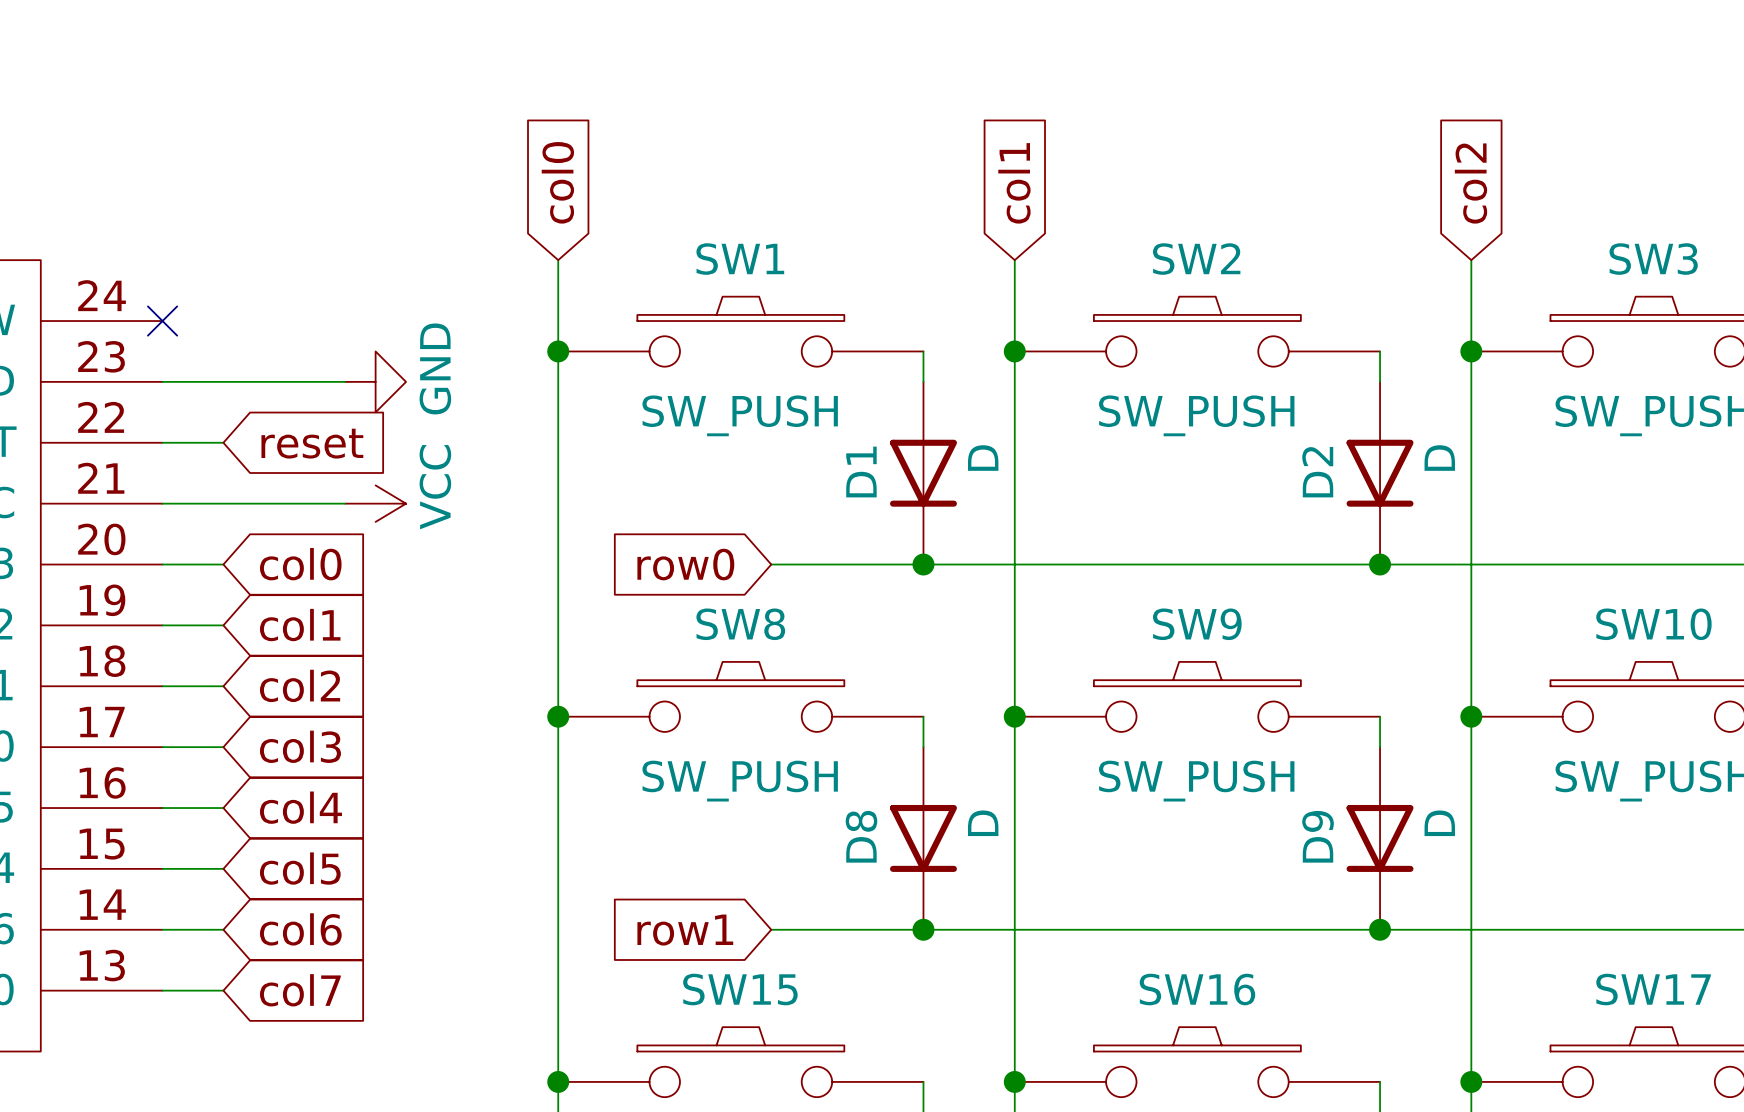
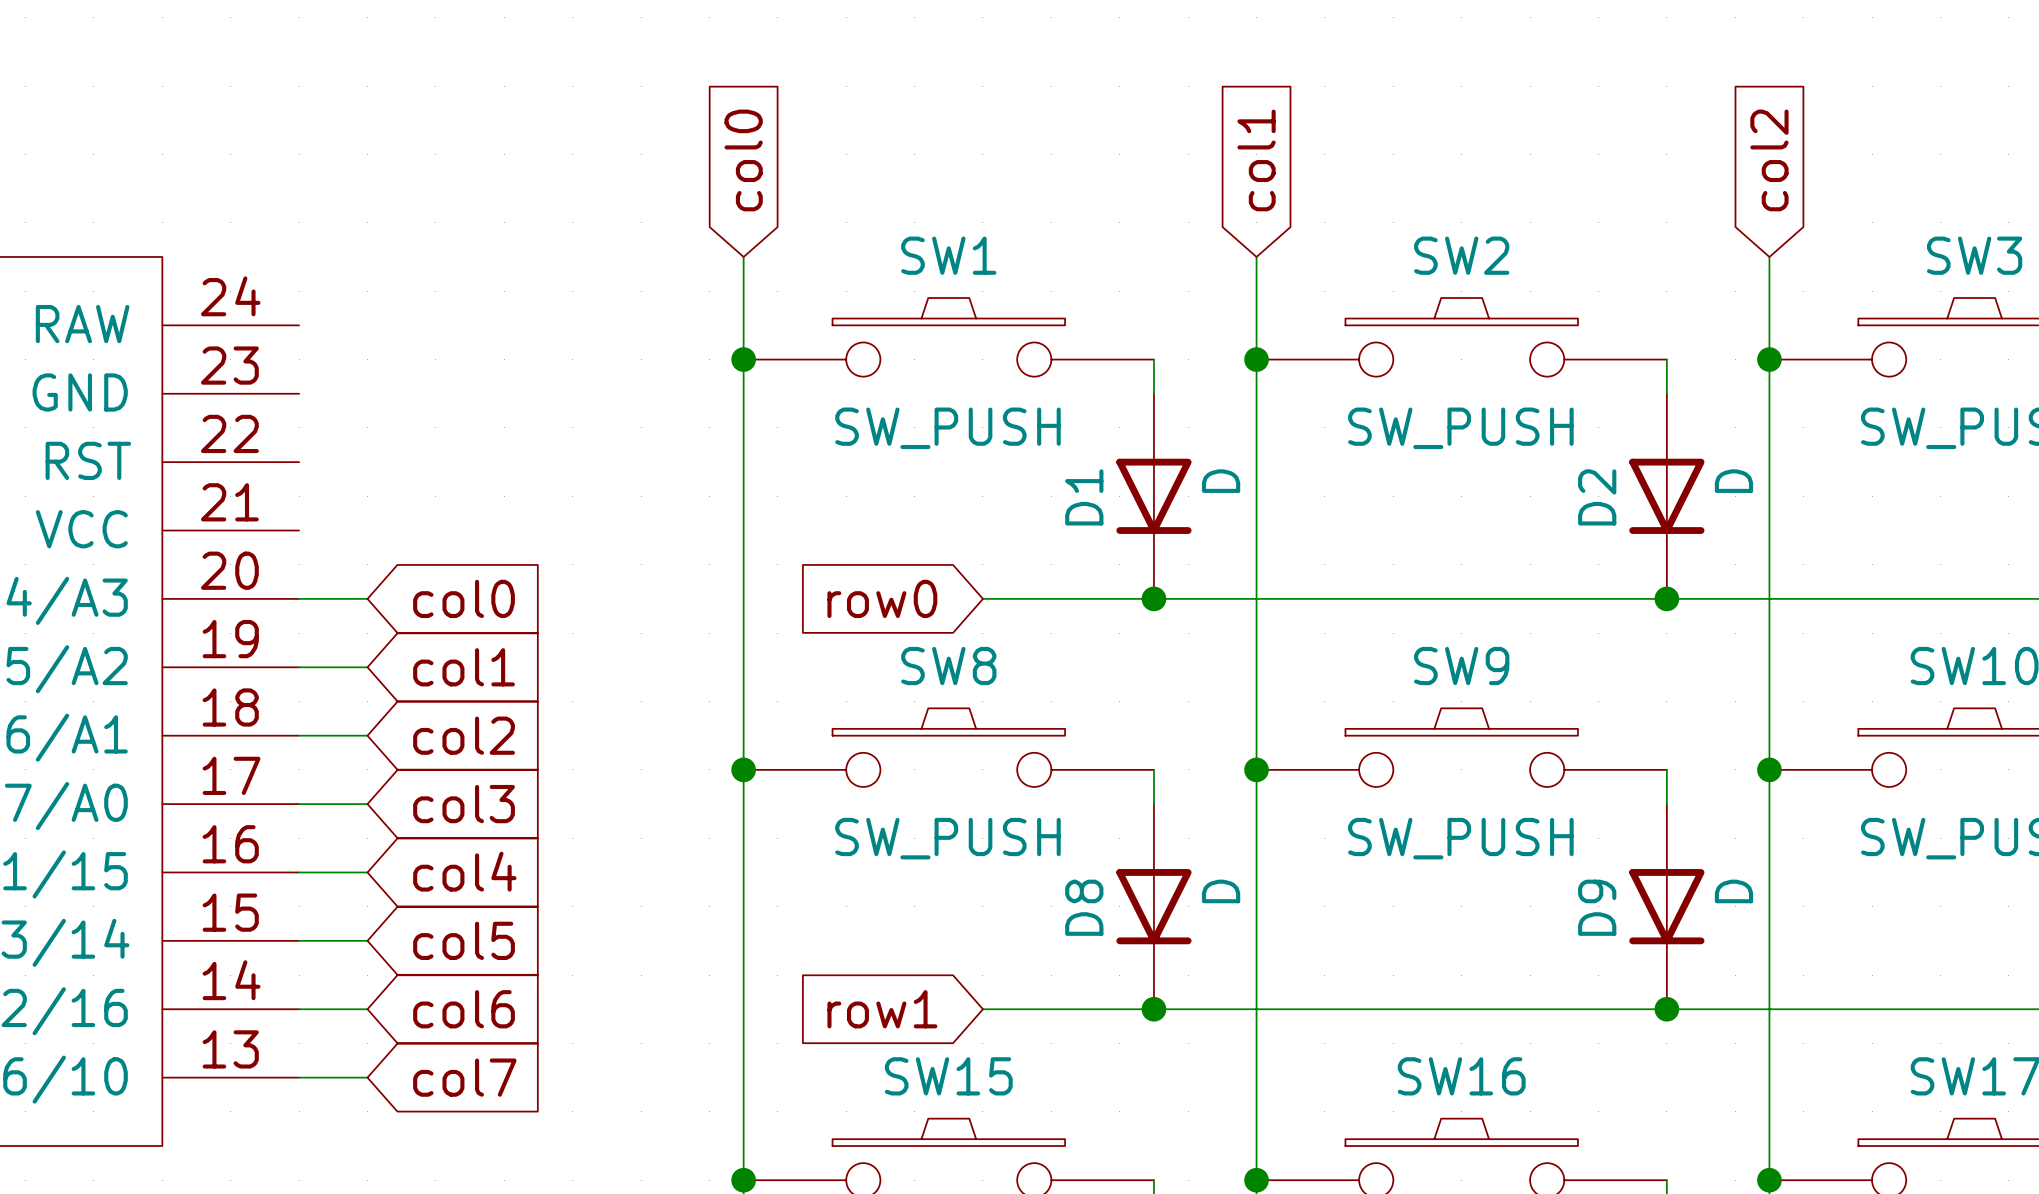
no-connect mark: (162, 321) -> none
wire: (162, 381) (345, 381) -> none
power symbol: GND (375, 381) -> none
wire: (162, 442) (223, 442) -> none
global label: reset (312, 443) -> none
wire: (162, 503) (345, 503) -> none
power symbol: VCC (375, 503) -> none

